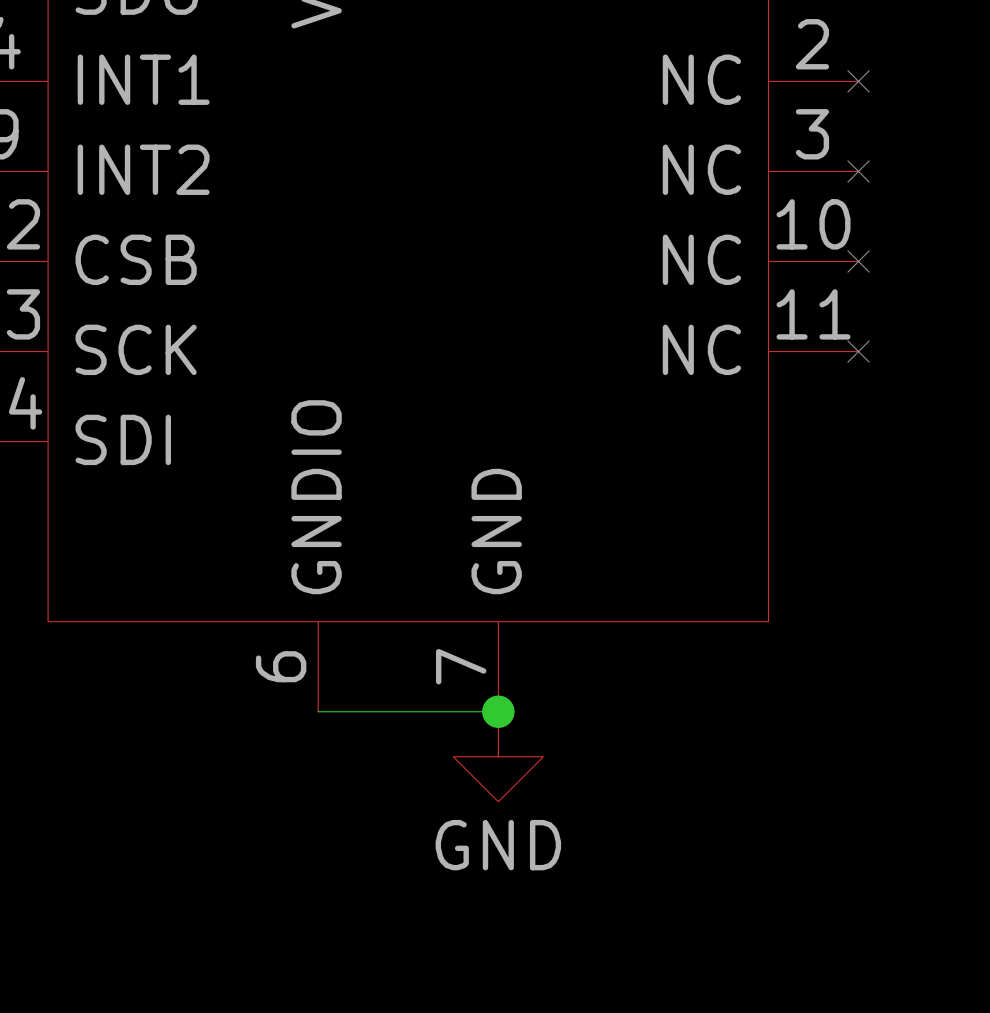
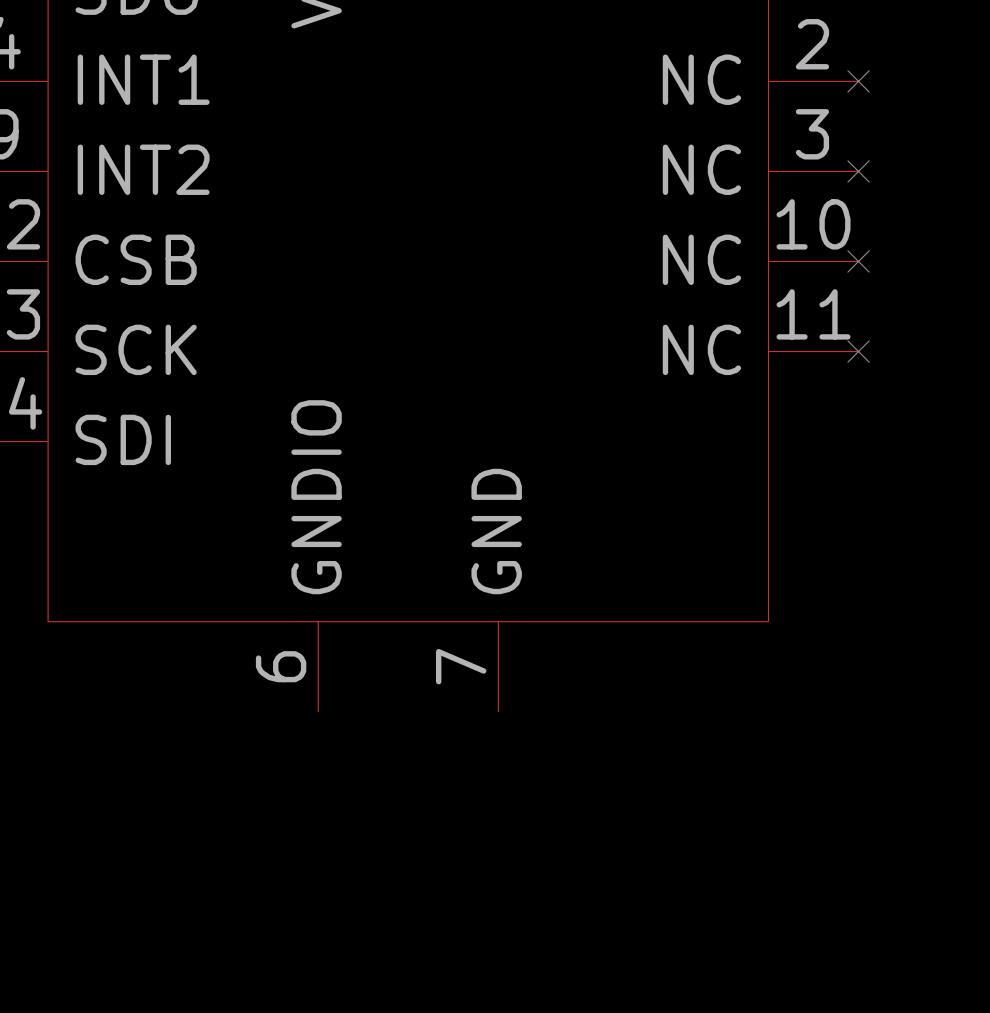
wire: (318, 711) (498, 711) -> none
junction: (498, 711) -> none
power symbol: GND (498, 756) -> none

